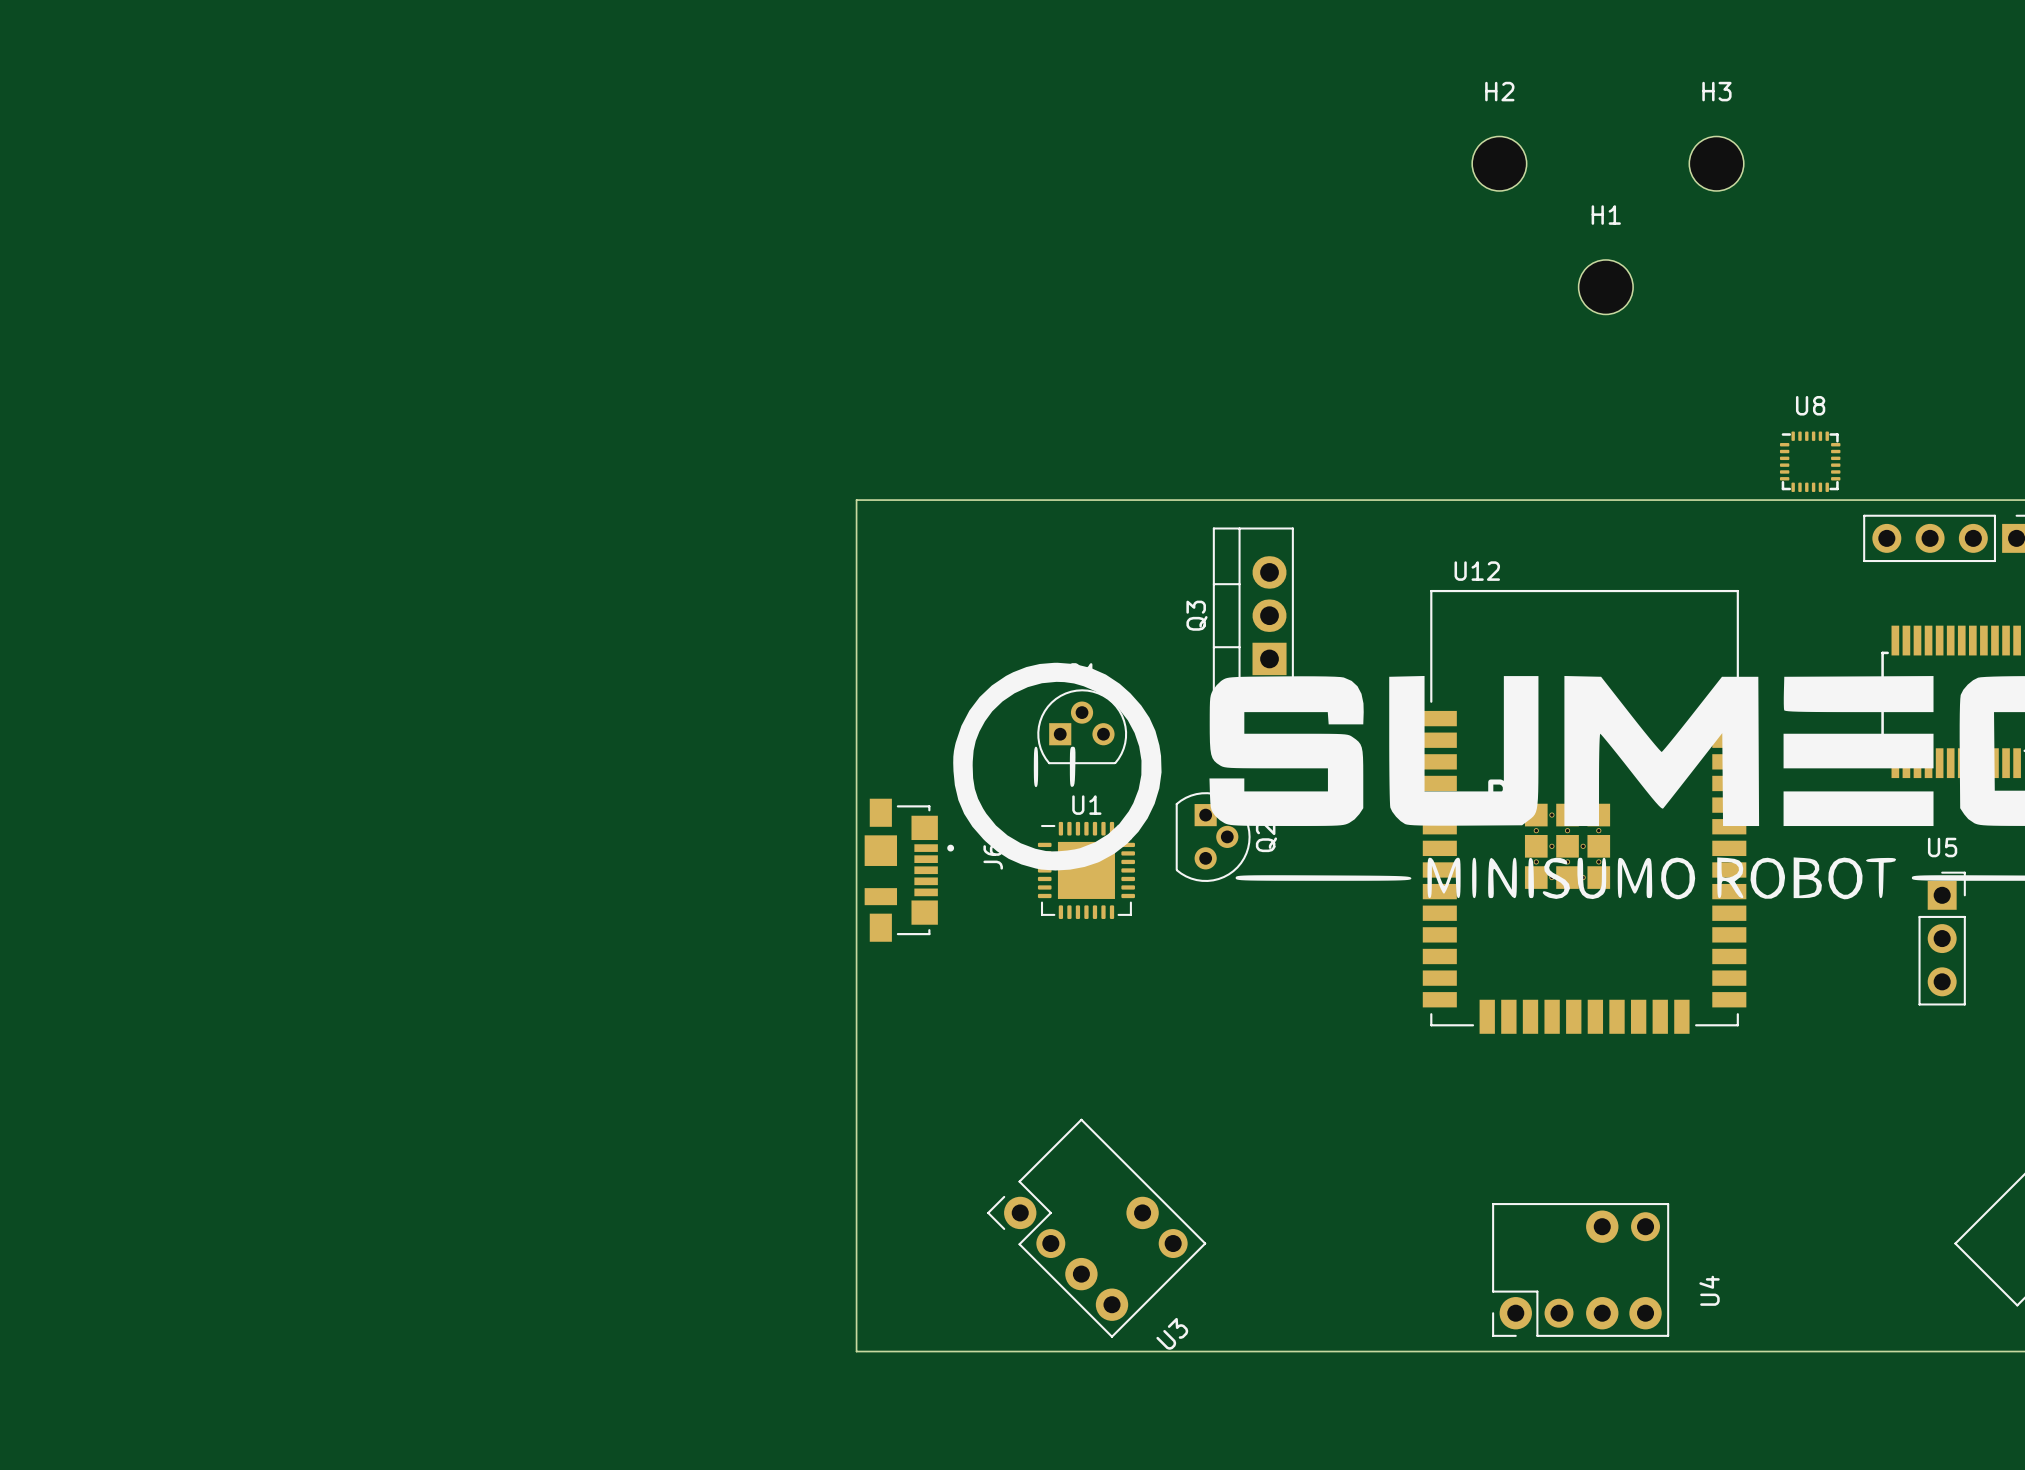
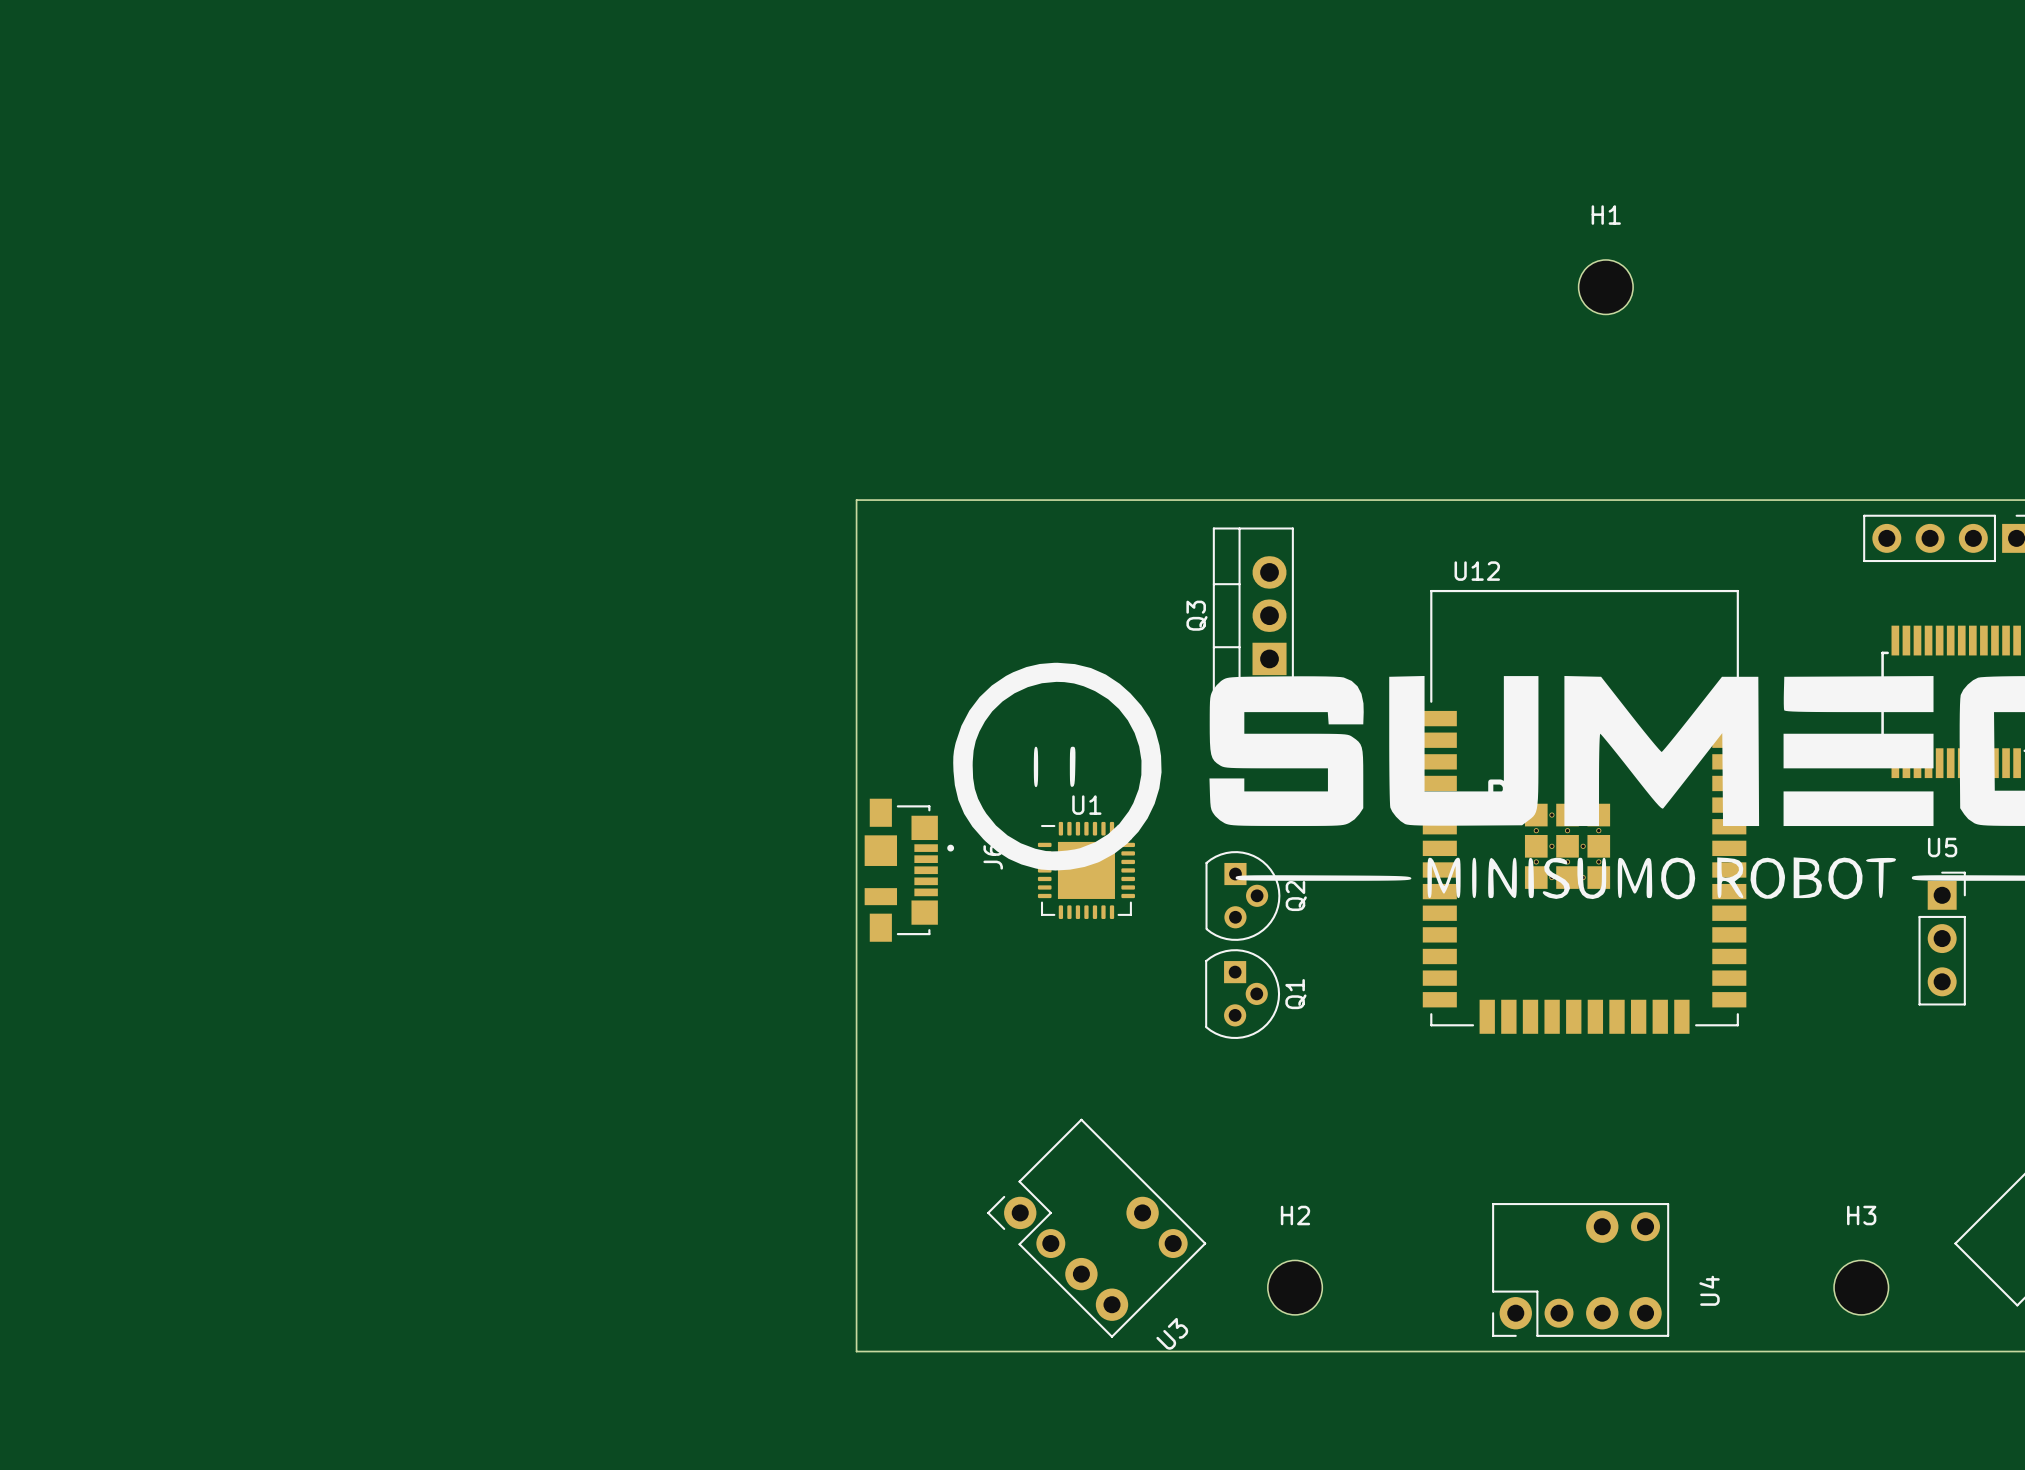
H2 position: (1499, 163) -> (1295, 1287)
H3 position: (1716, 163) -> (1861, 1287)
U8: (1810, 461) -> none
Q1 rotation: 0° (1082, 726) -> 90° clockwise (1242, 994)
Q1 position: (1082, 726) -> (1242, 994)
Q2 position: (1213, 837) -> (1242, 895)

